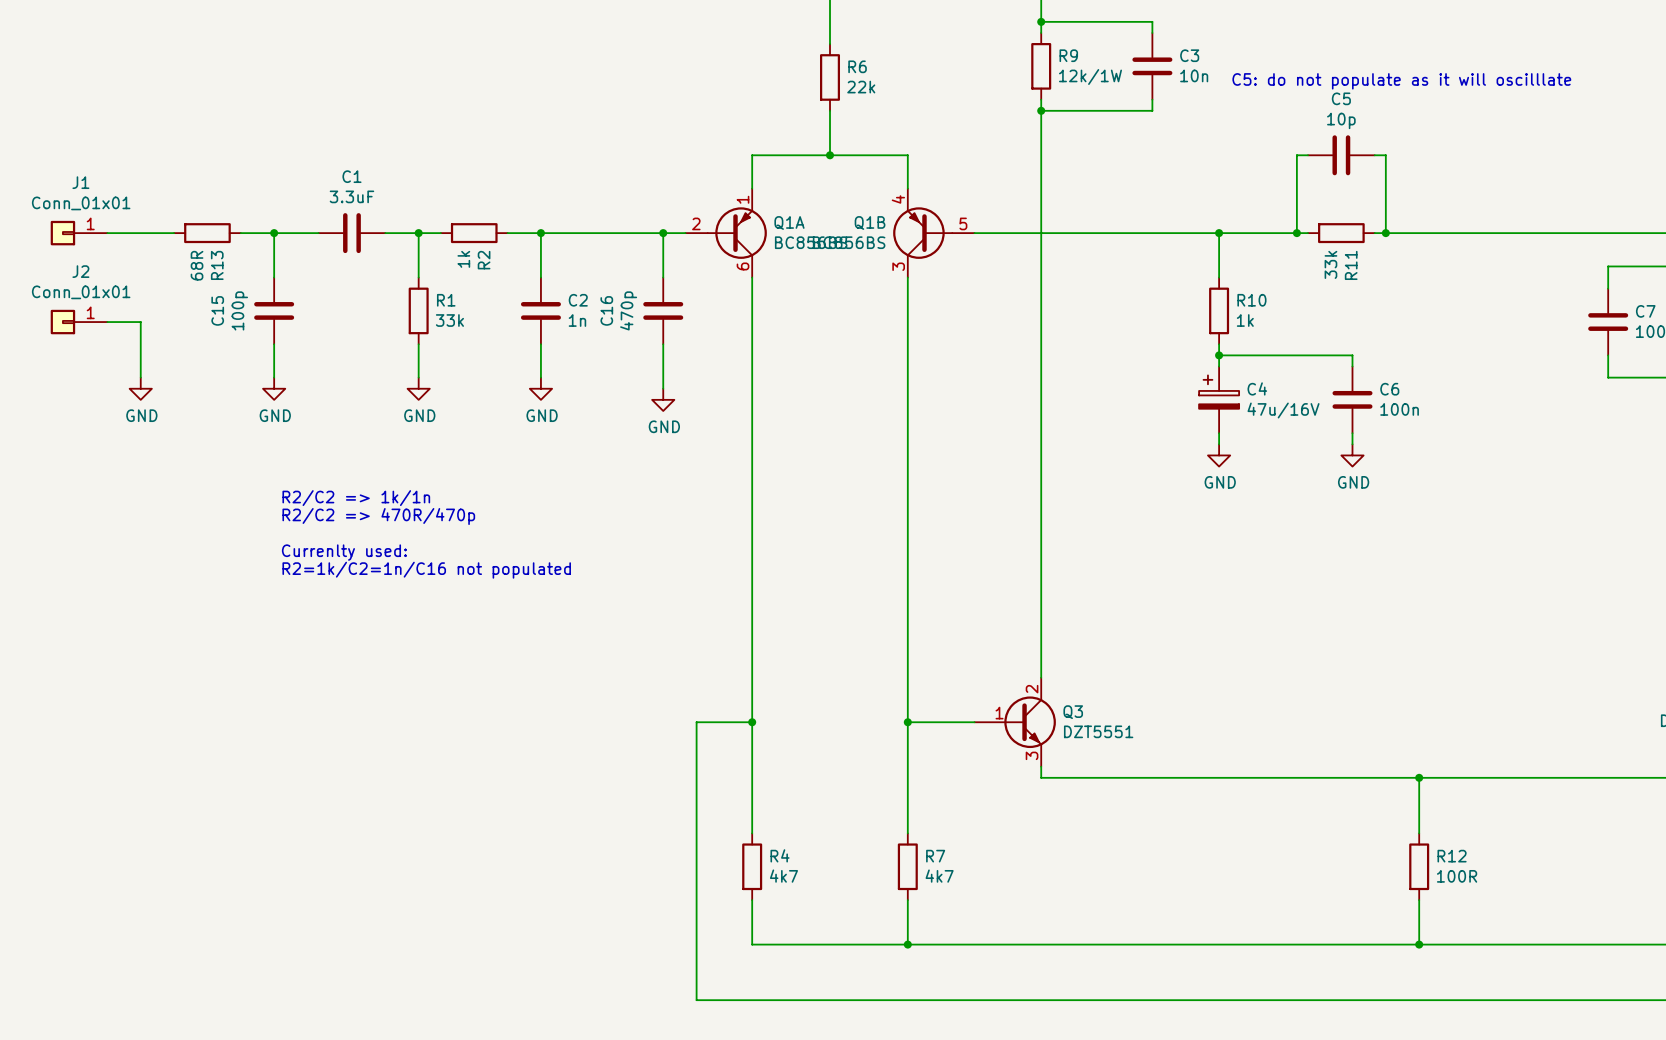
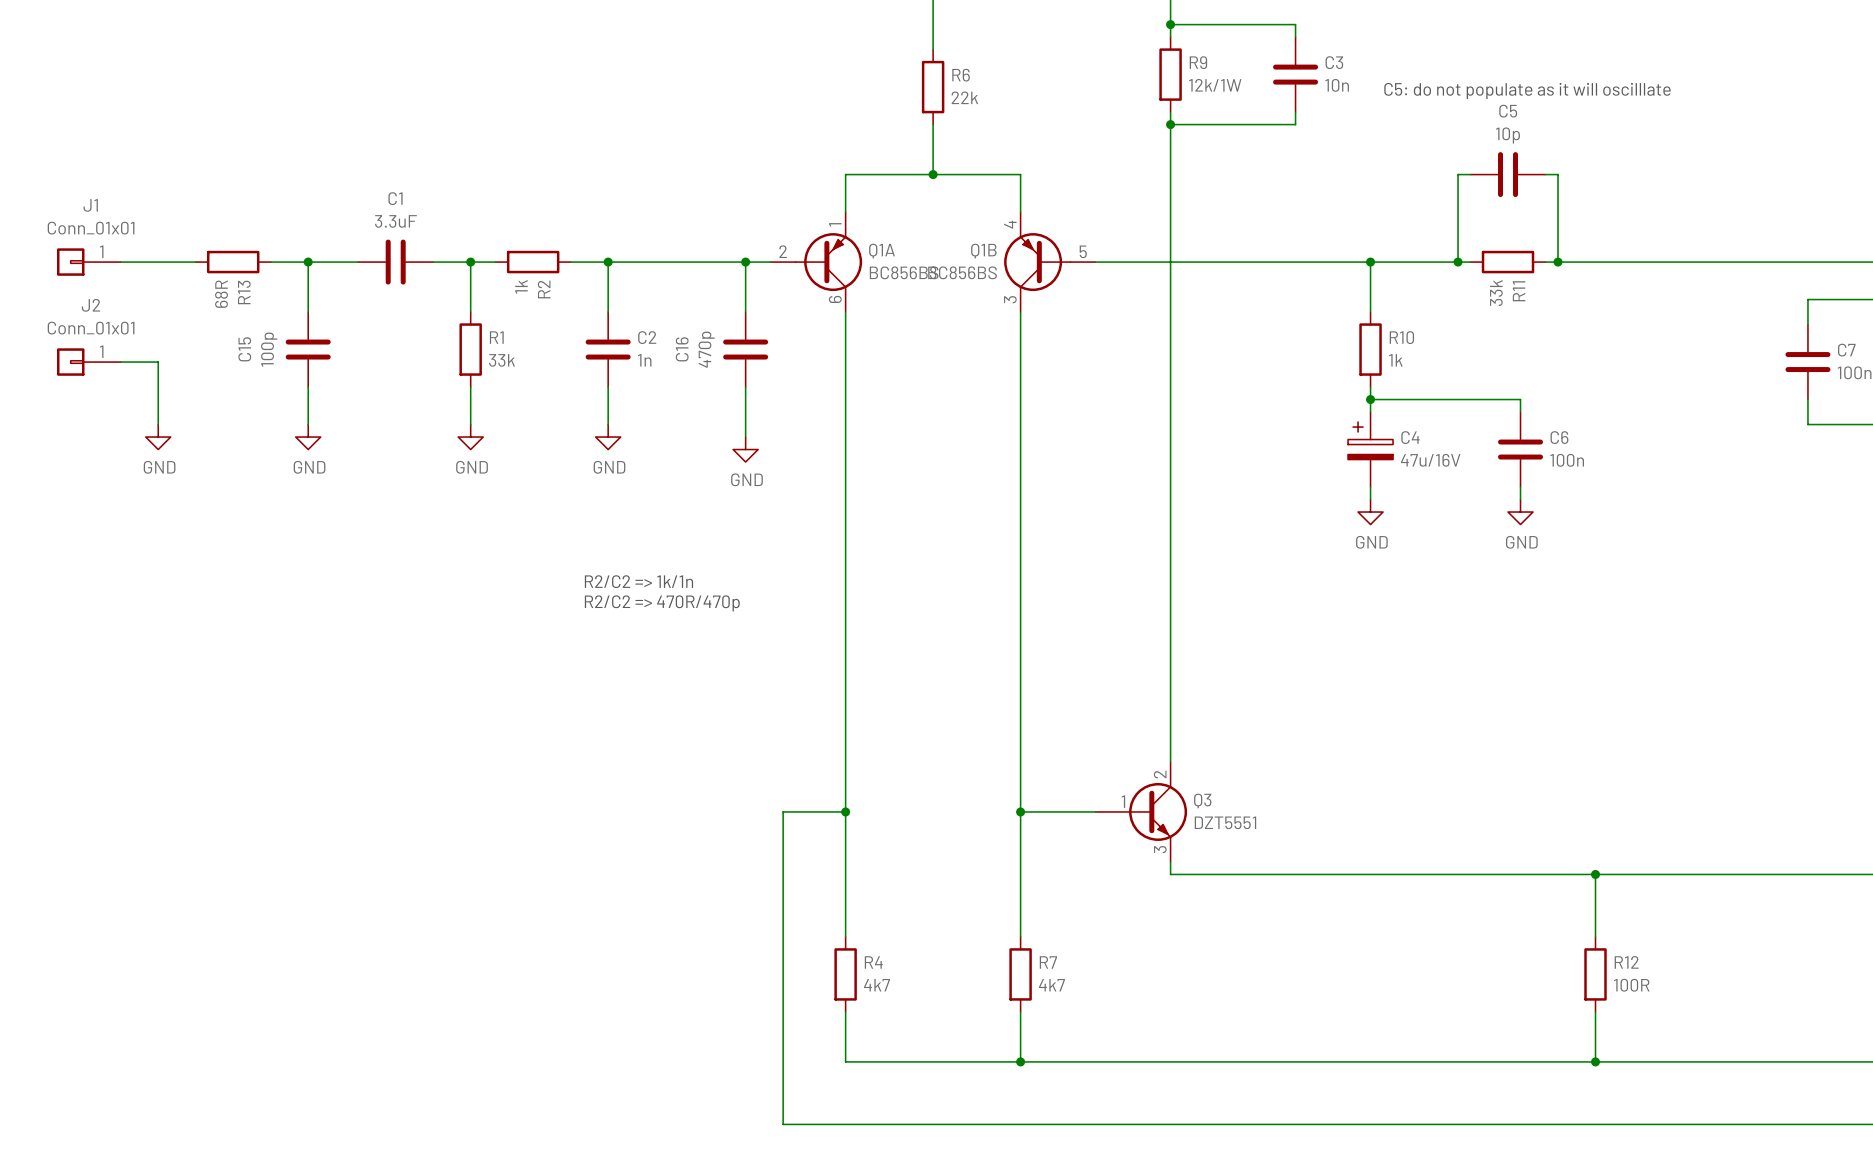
text: R2/C2 => 1k/1n (356, 498) -> none
text: R2/C2 => 470R/470p (378, 516) -> none
text: none -> R2/C2 => 1k/1n (638, 581)
text: none -> R2/C2 => 470R/470p (662, 603)
text: Currenlty used: (344, 552) -> none
text: R2=1k/C2=1n/C16 not populated (426, 570) -> none

